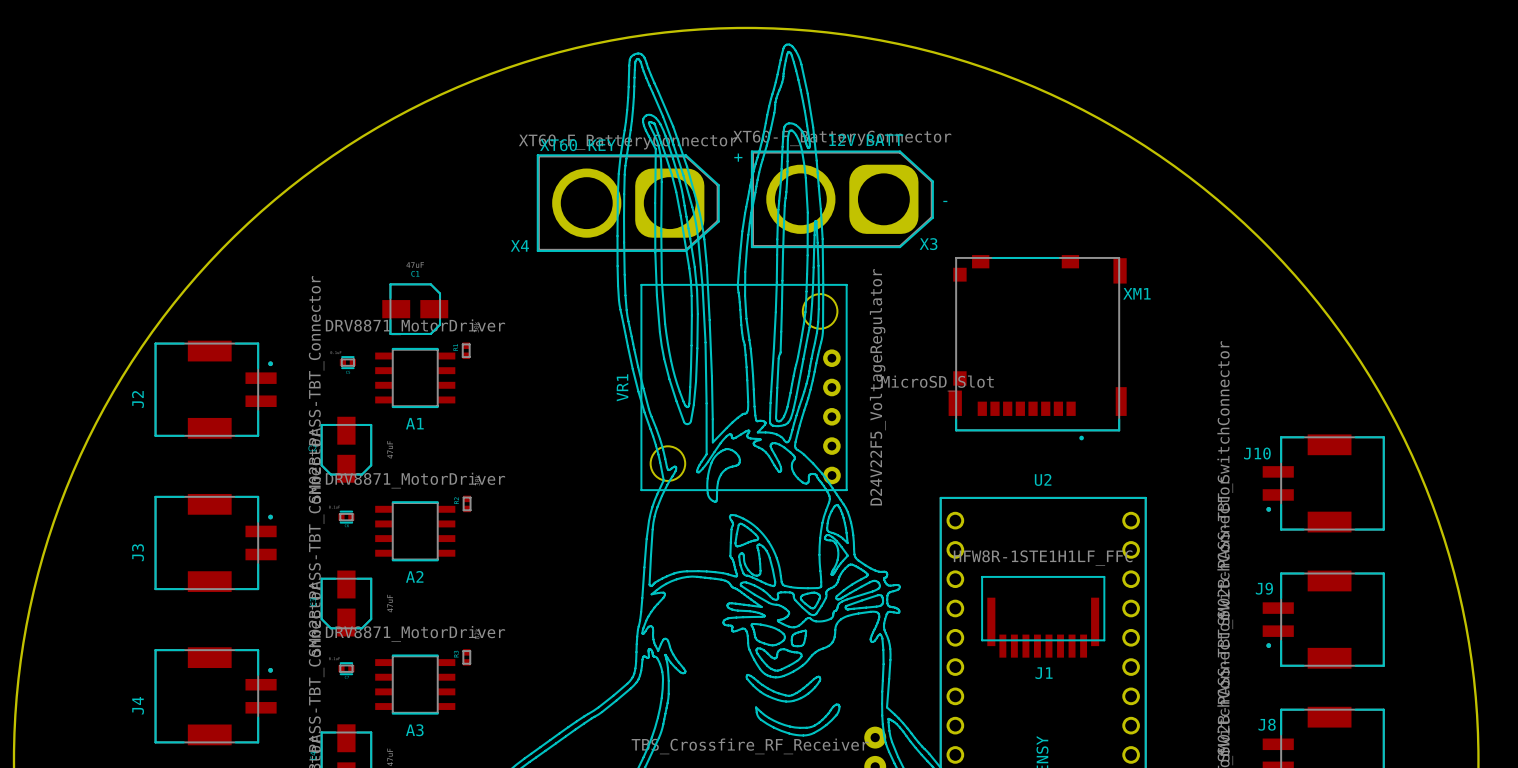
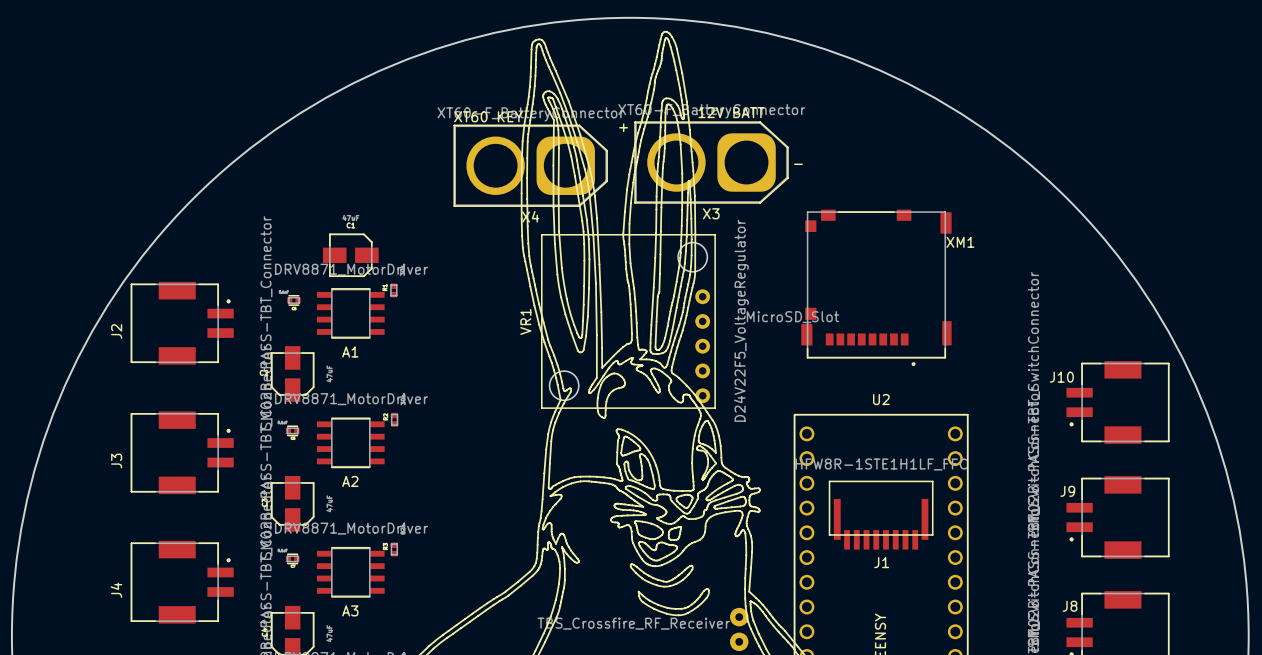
X3 name position: X3 (928, 244) -> X3 (711, 213)
X4 name position: X4 (519, 245) -> X4 (530, 216)

